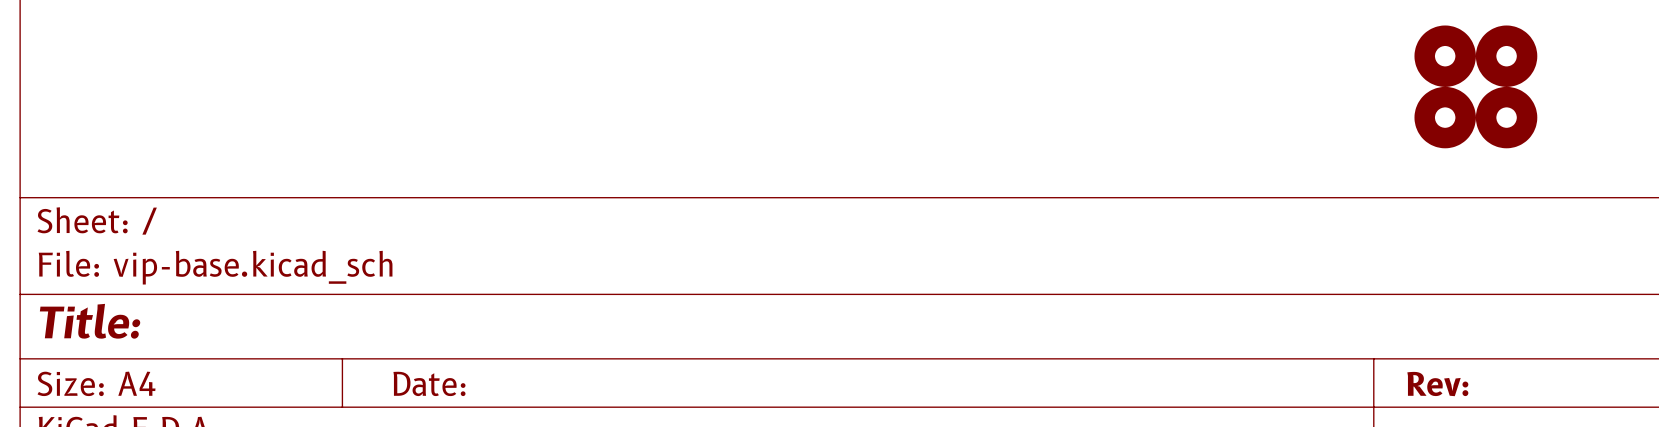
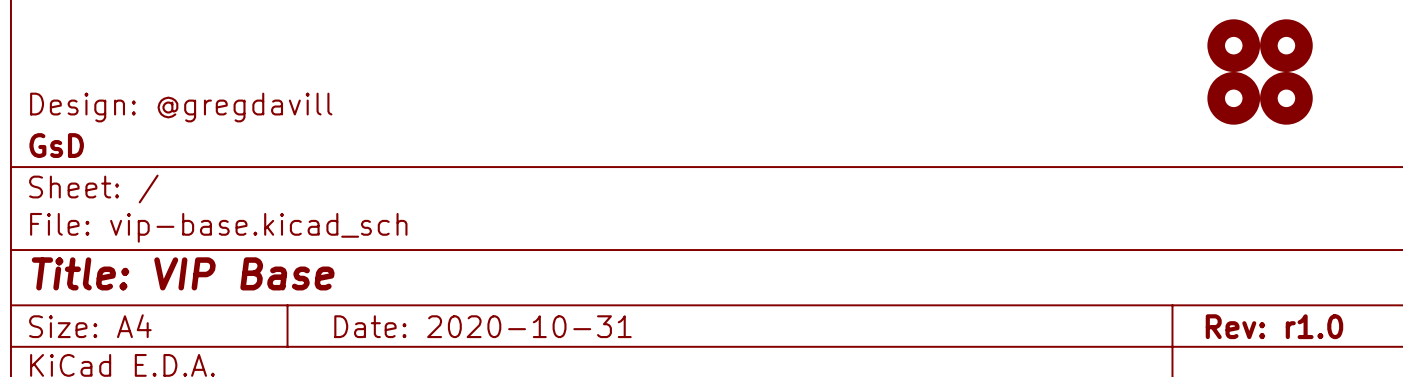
title block: none -> Design: @gregdavill (181, 107)
title block: none -> GsD (56, 145)
title block: Title: (90, 321) -> Title: VIP Base (183, 273)
title block: Date: (429, 383) -> Date: 2020-10-31 (482, 326)
title block: Rev: (1437, 384) -> Rev: r1.0 (1274, 326)

